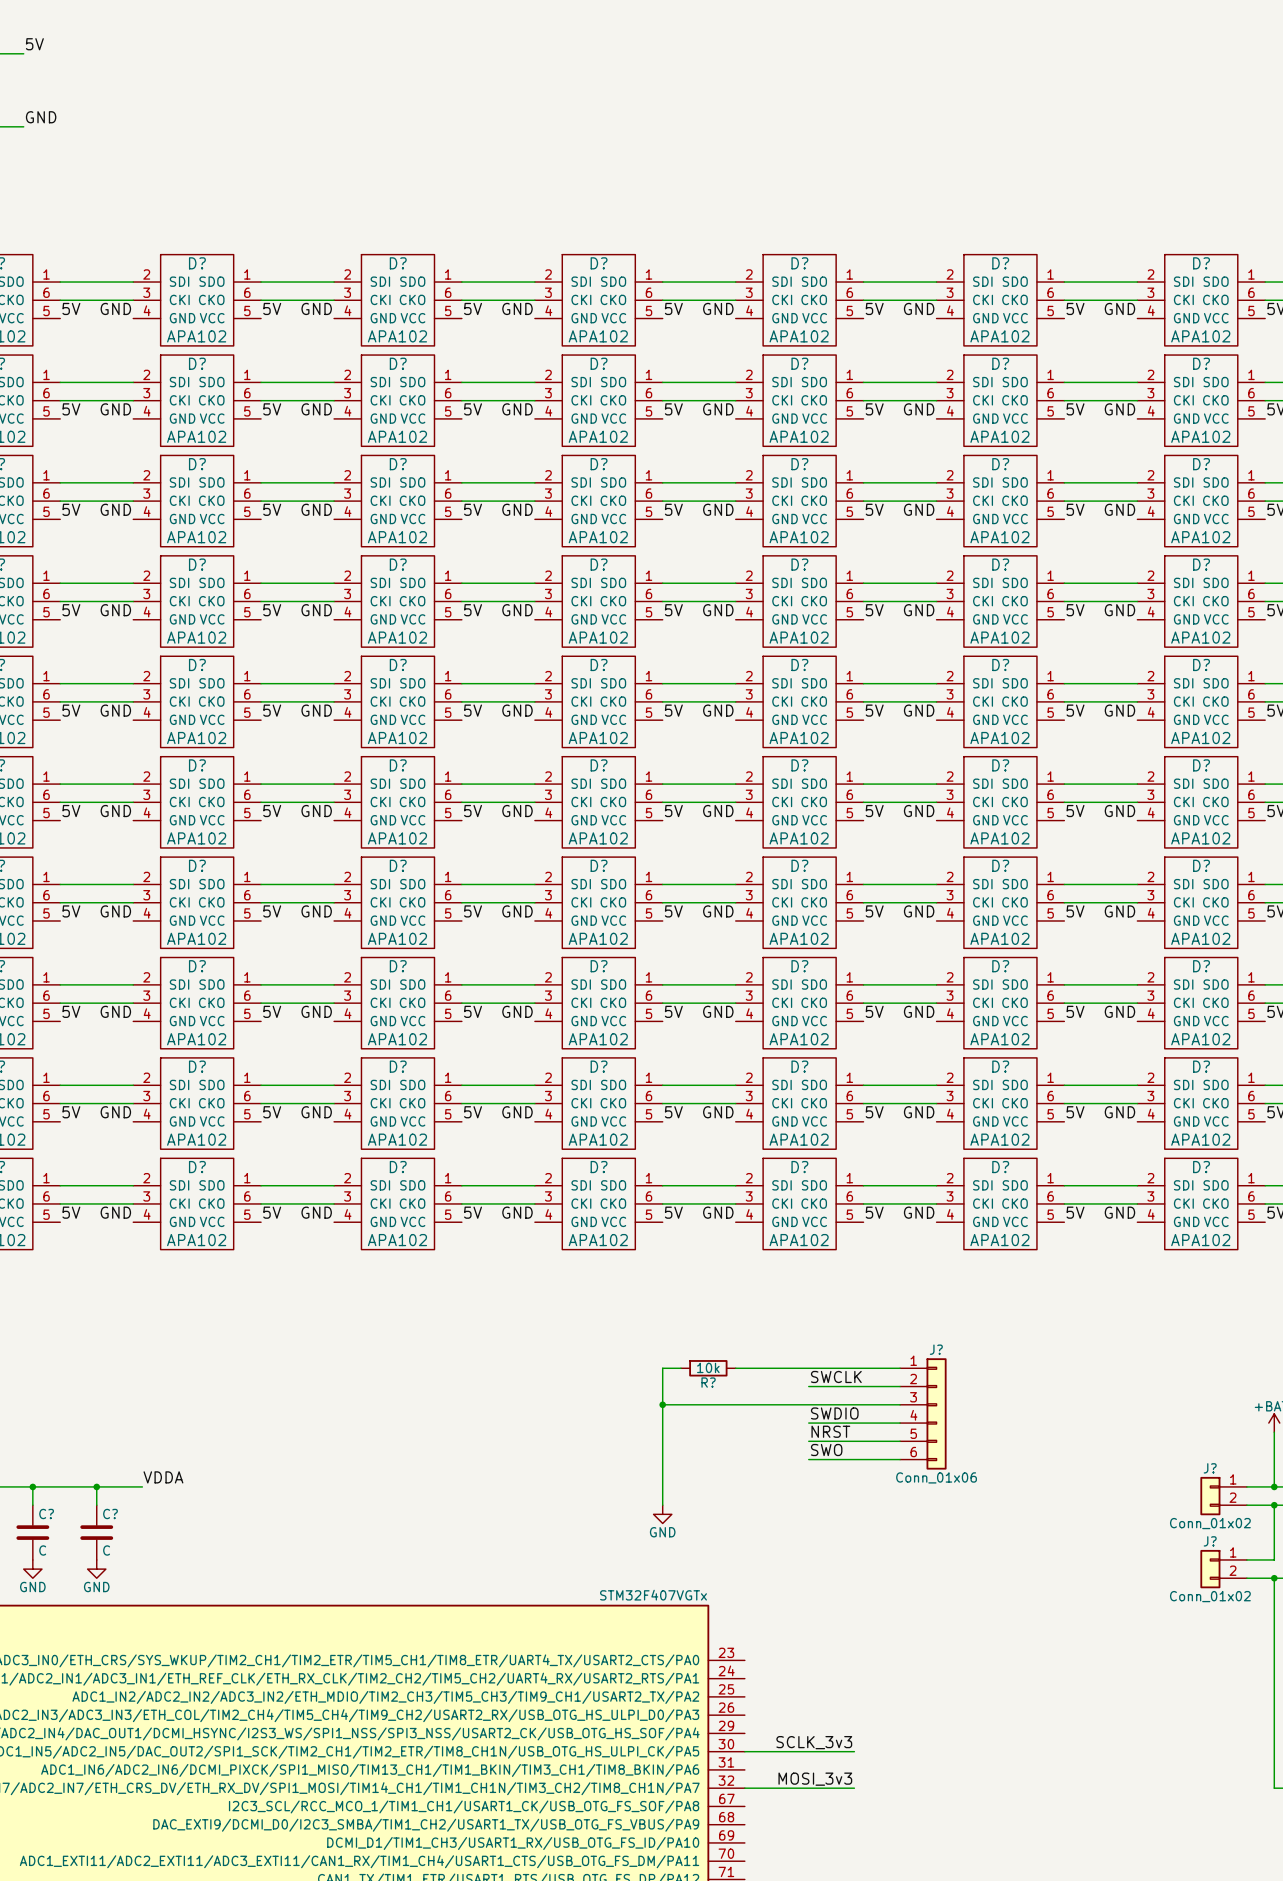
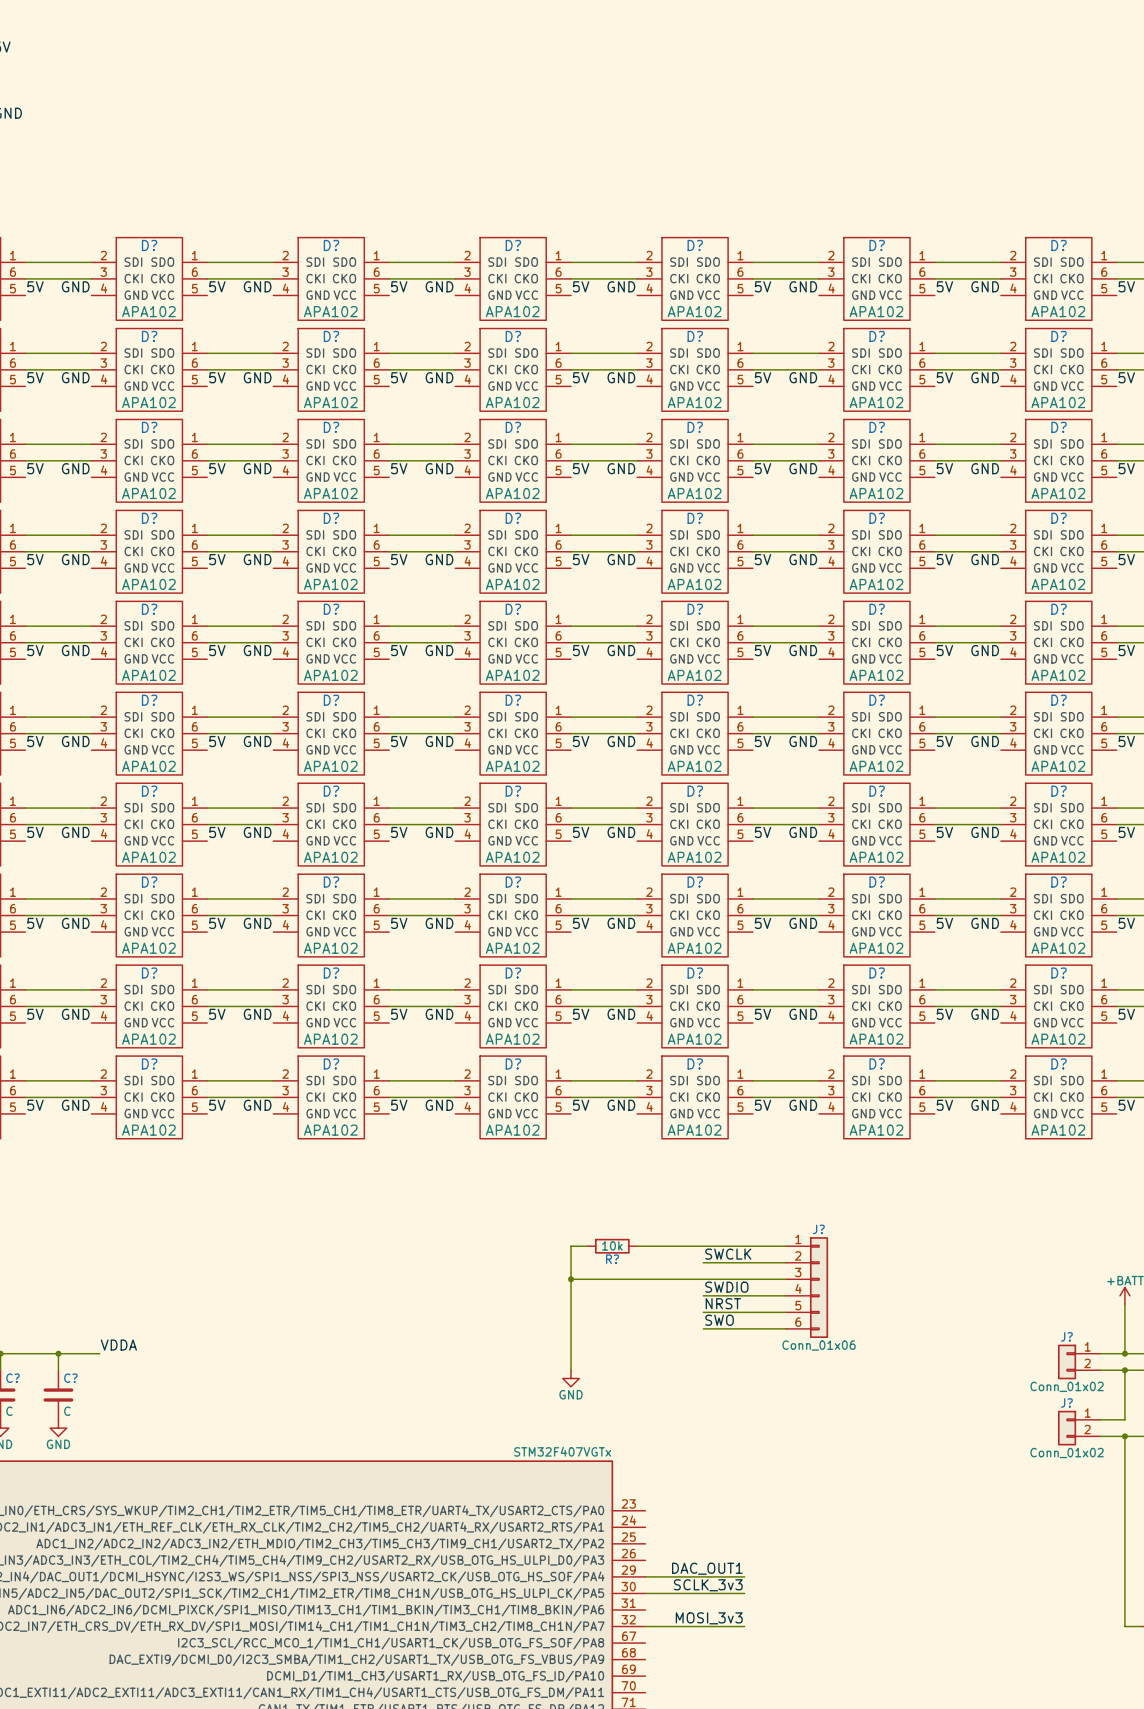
label: none -> DAC_OUT1 (707, 1568)
wire: none -> (645, 1576) (744, 1576)

